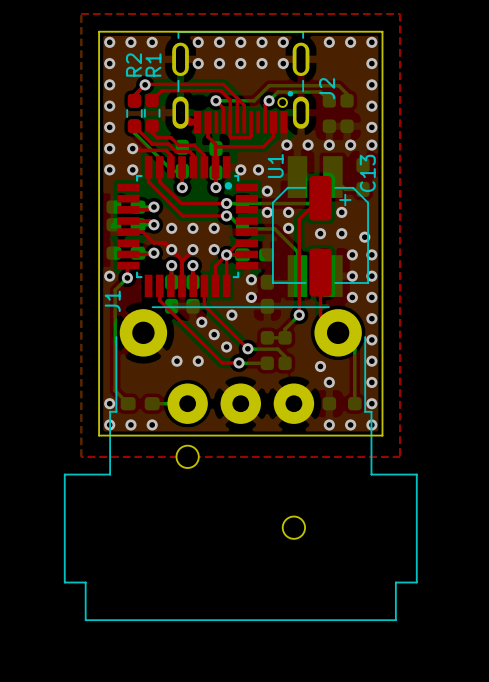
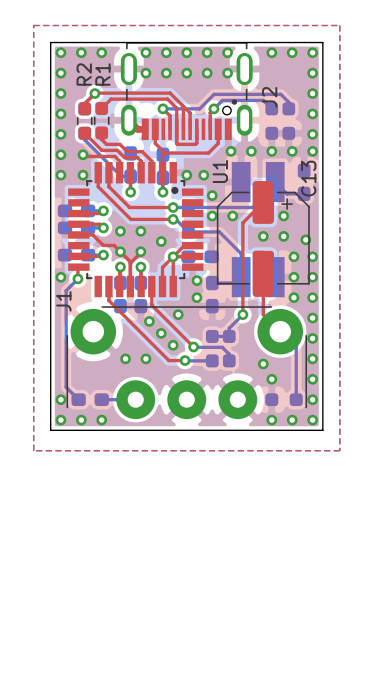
via: (214, 228) -> none
via: (288, 228) -> none
via: none -> (161, 241)
via: (214, 249) -> none
J1 footprint: [63, 306, 418, 622] -> [66, 306, 308, 420]

